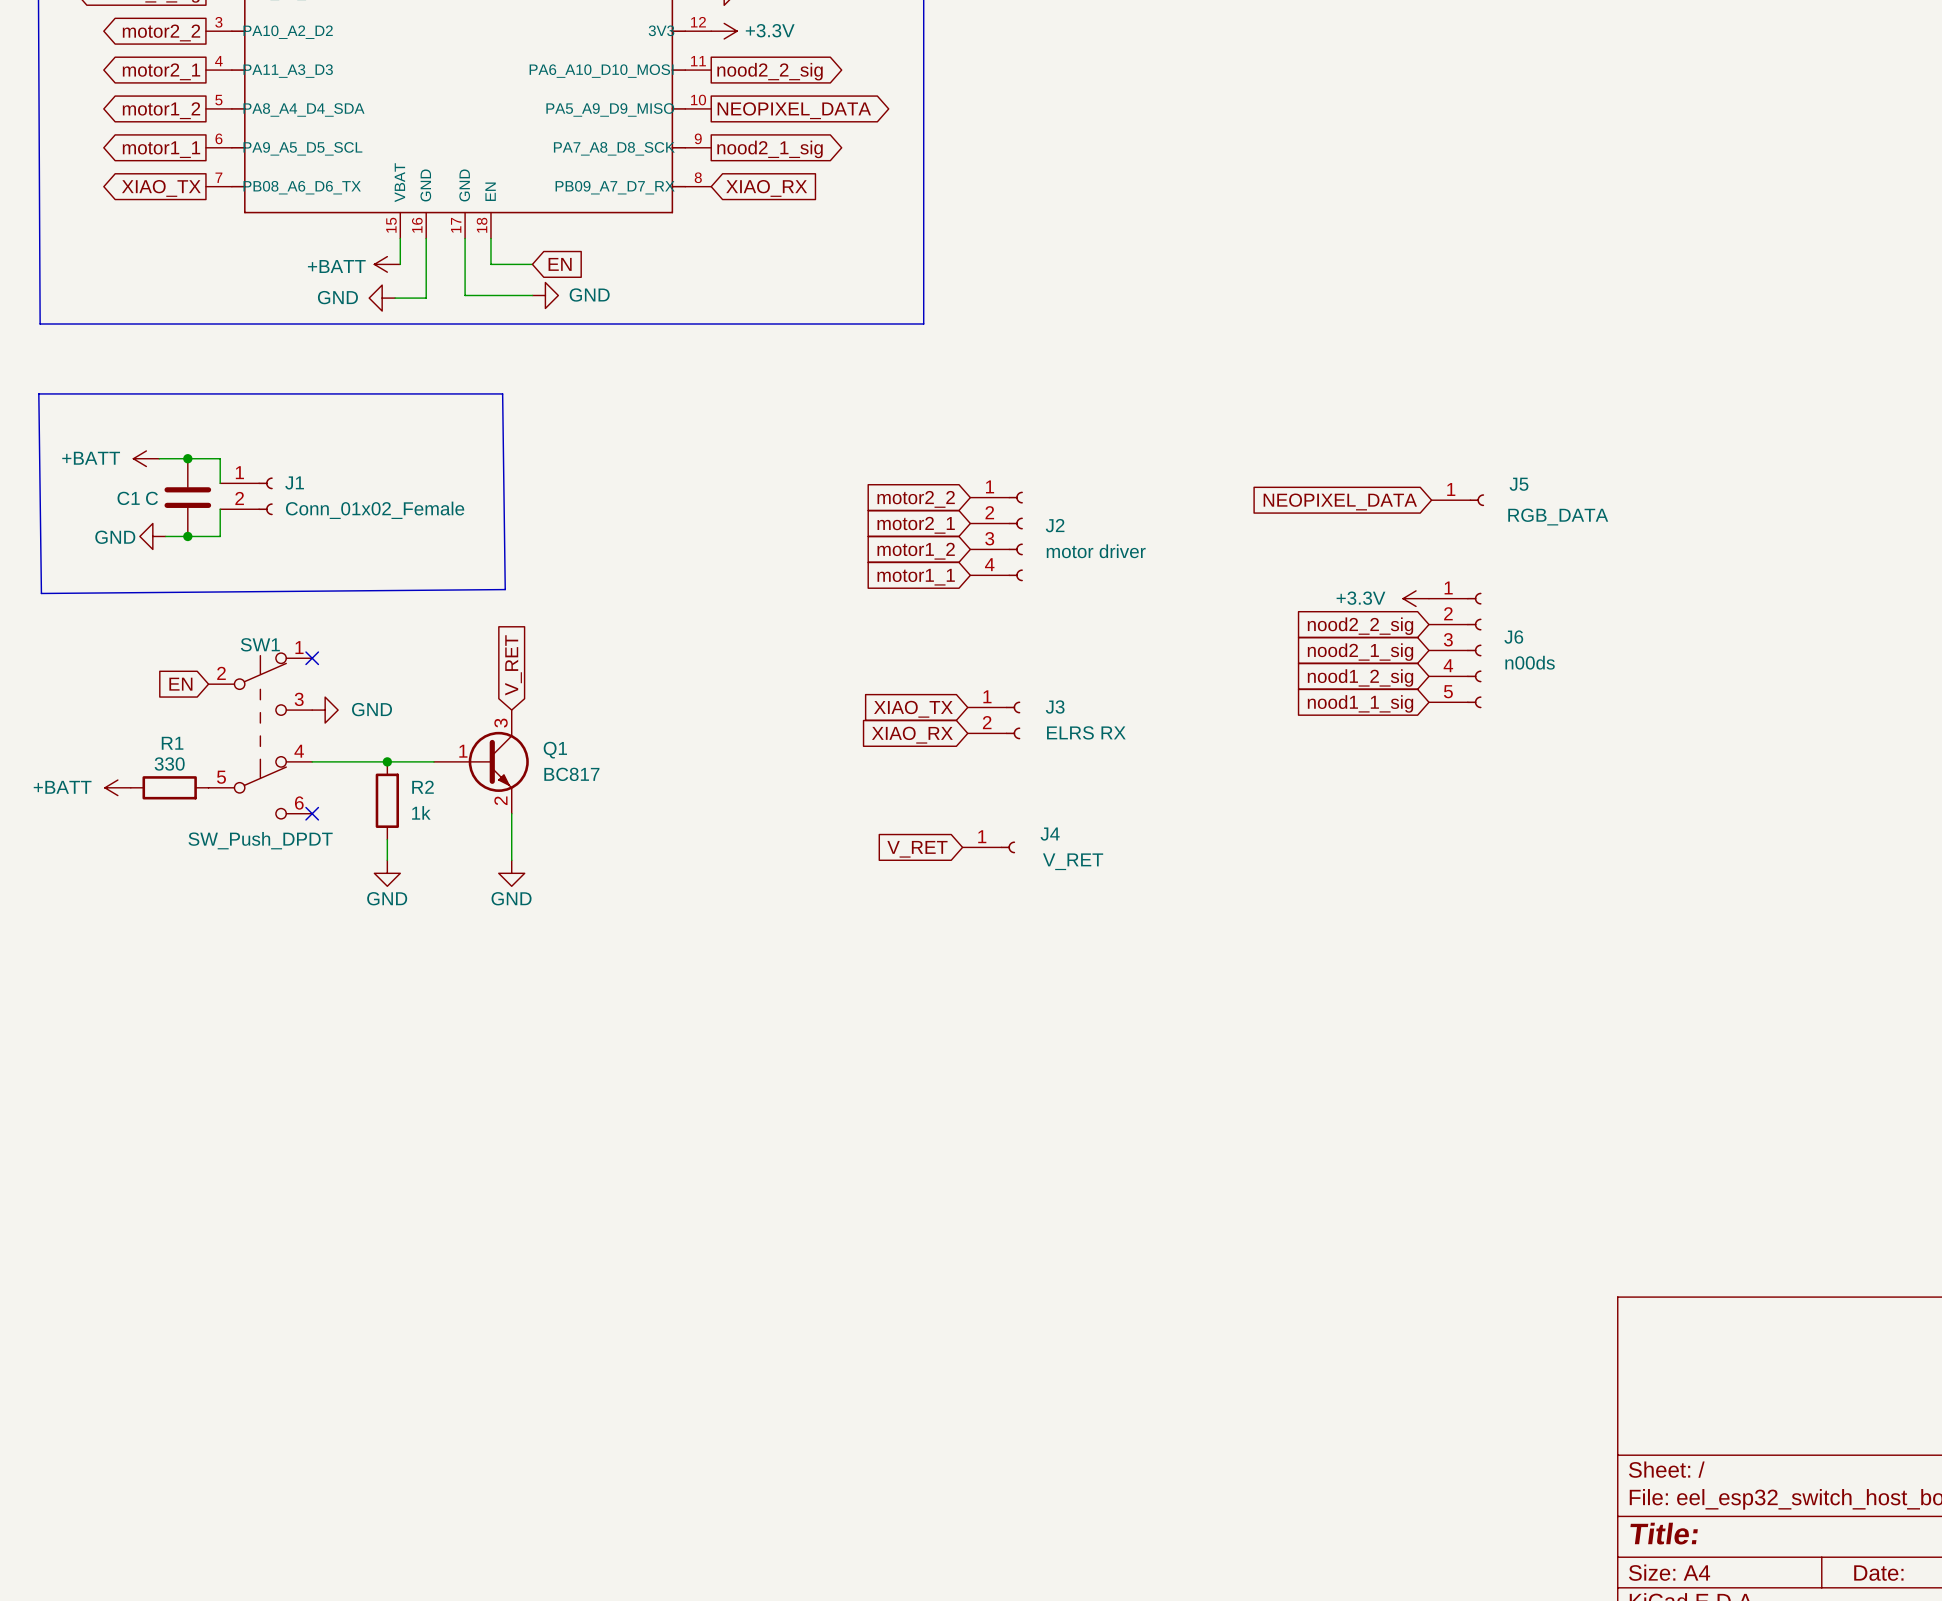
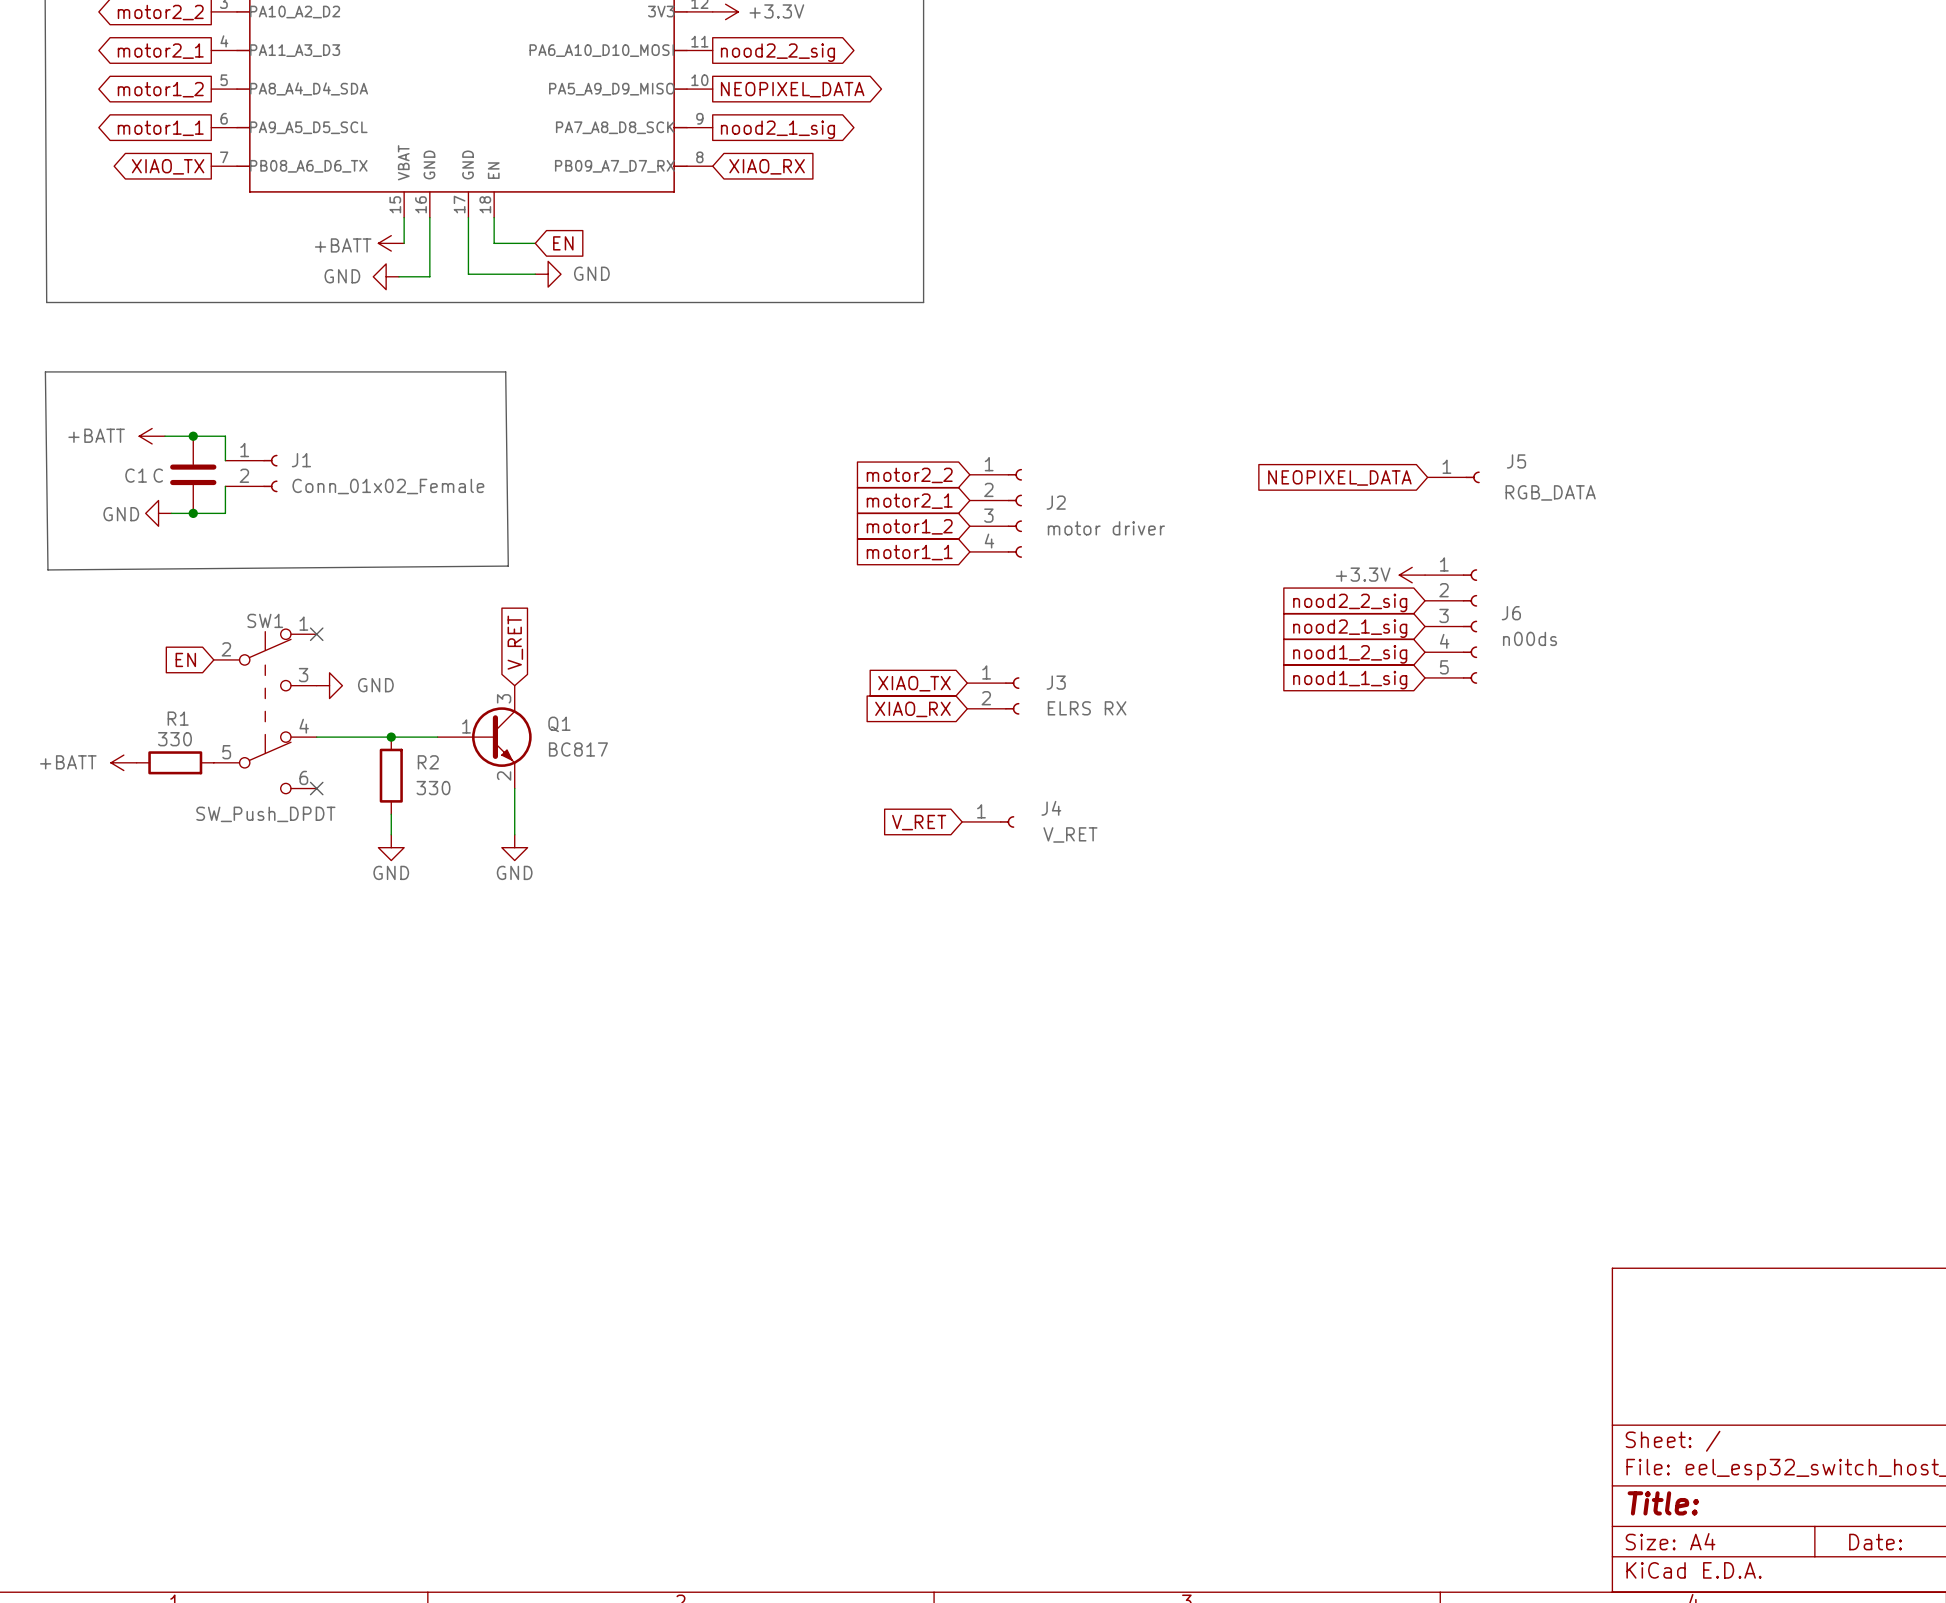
R2 value: 1k (421, 812) -> 330 (433, 788)

